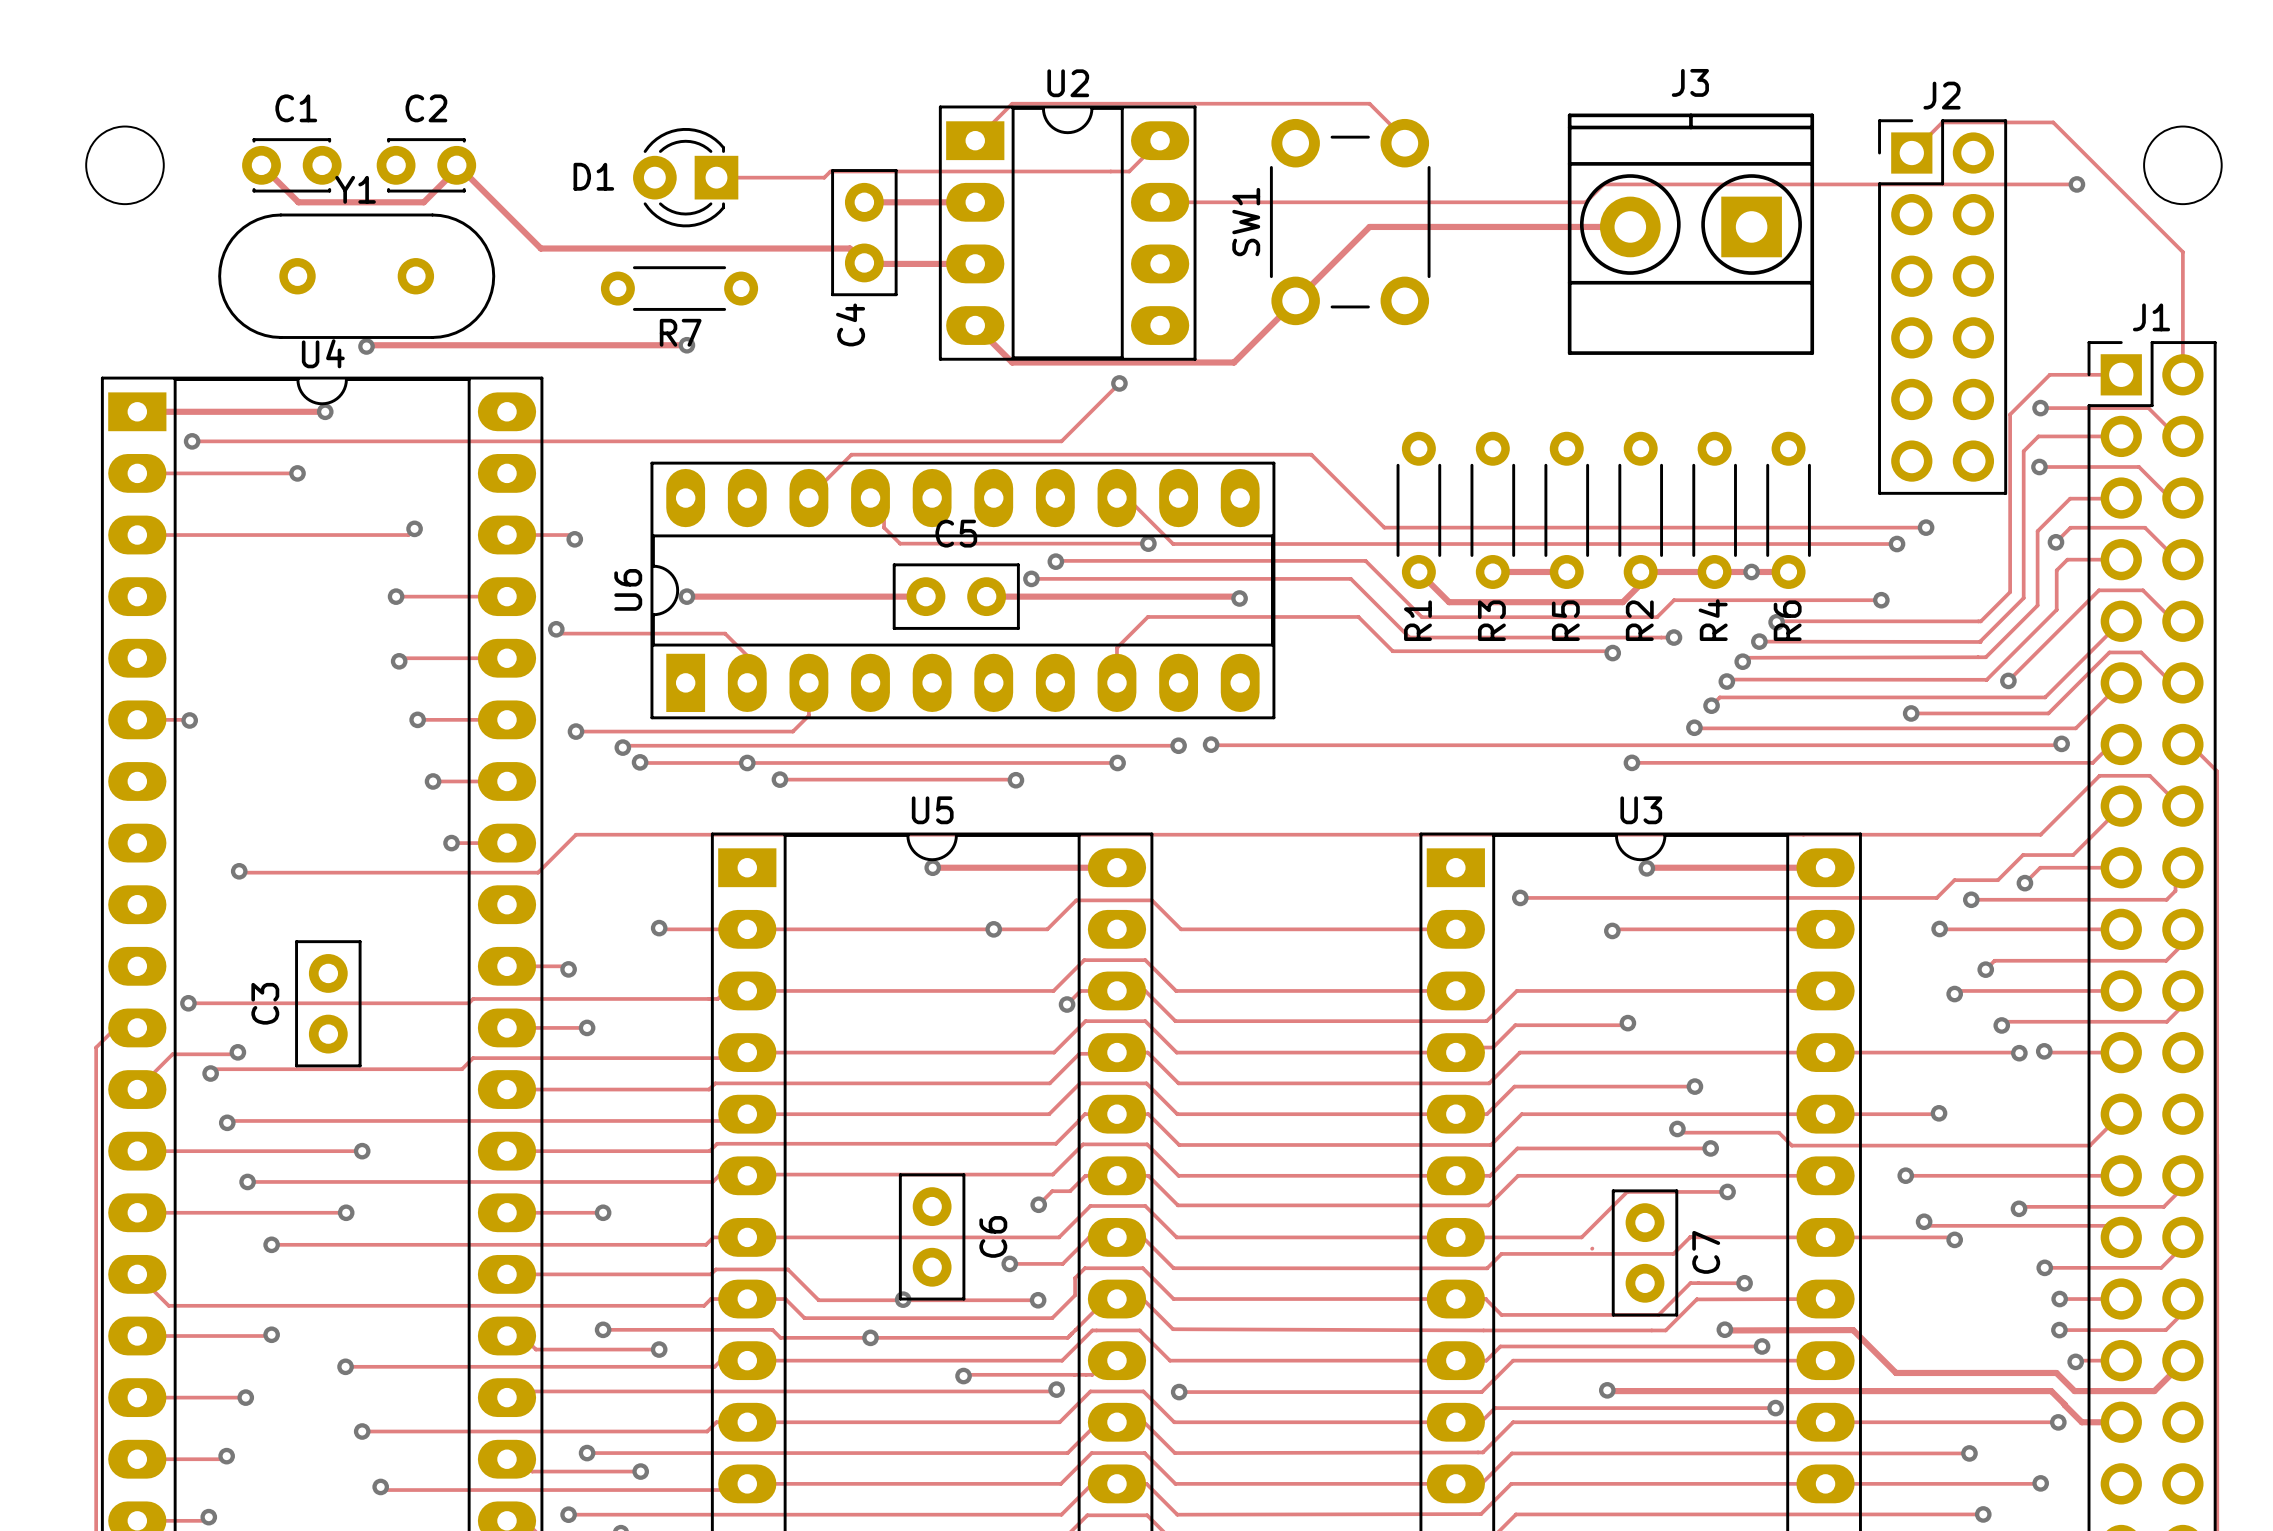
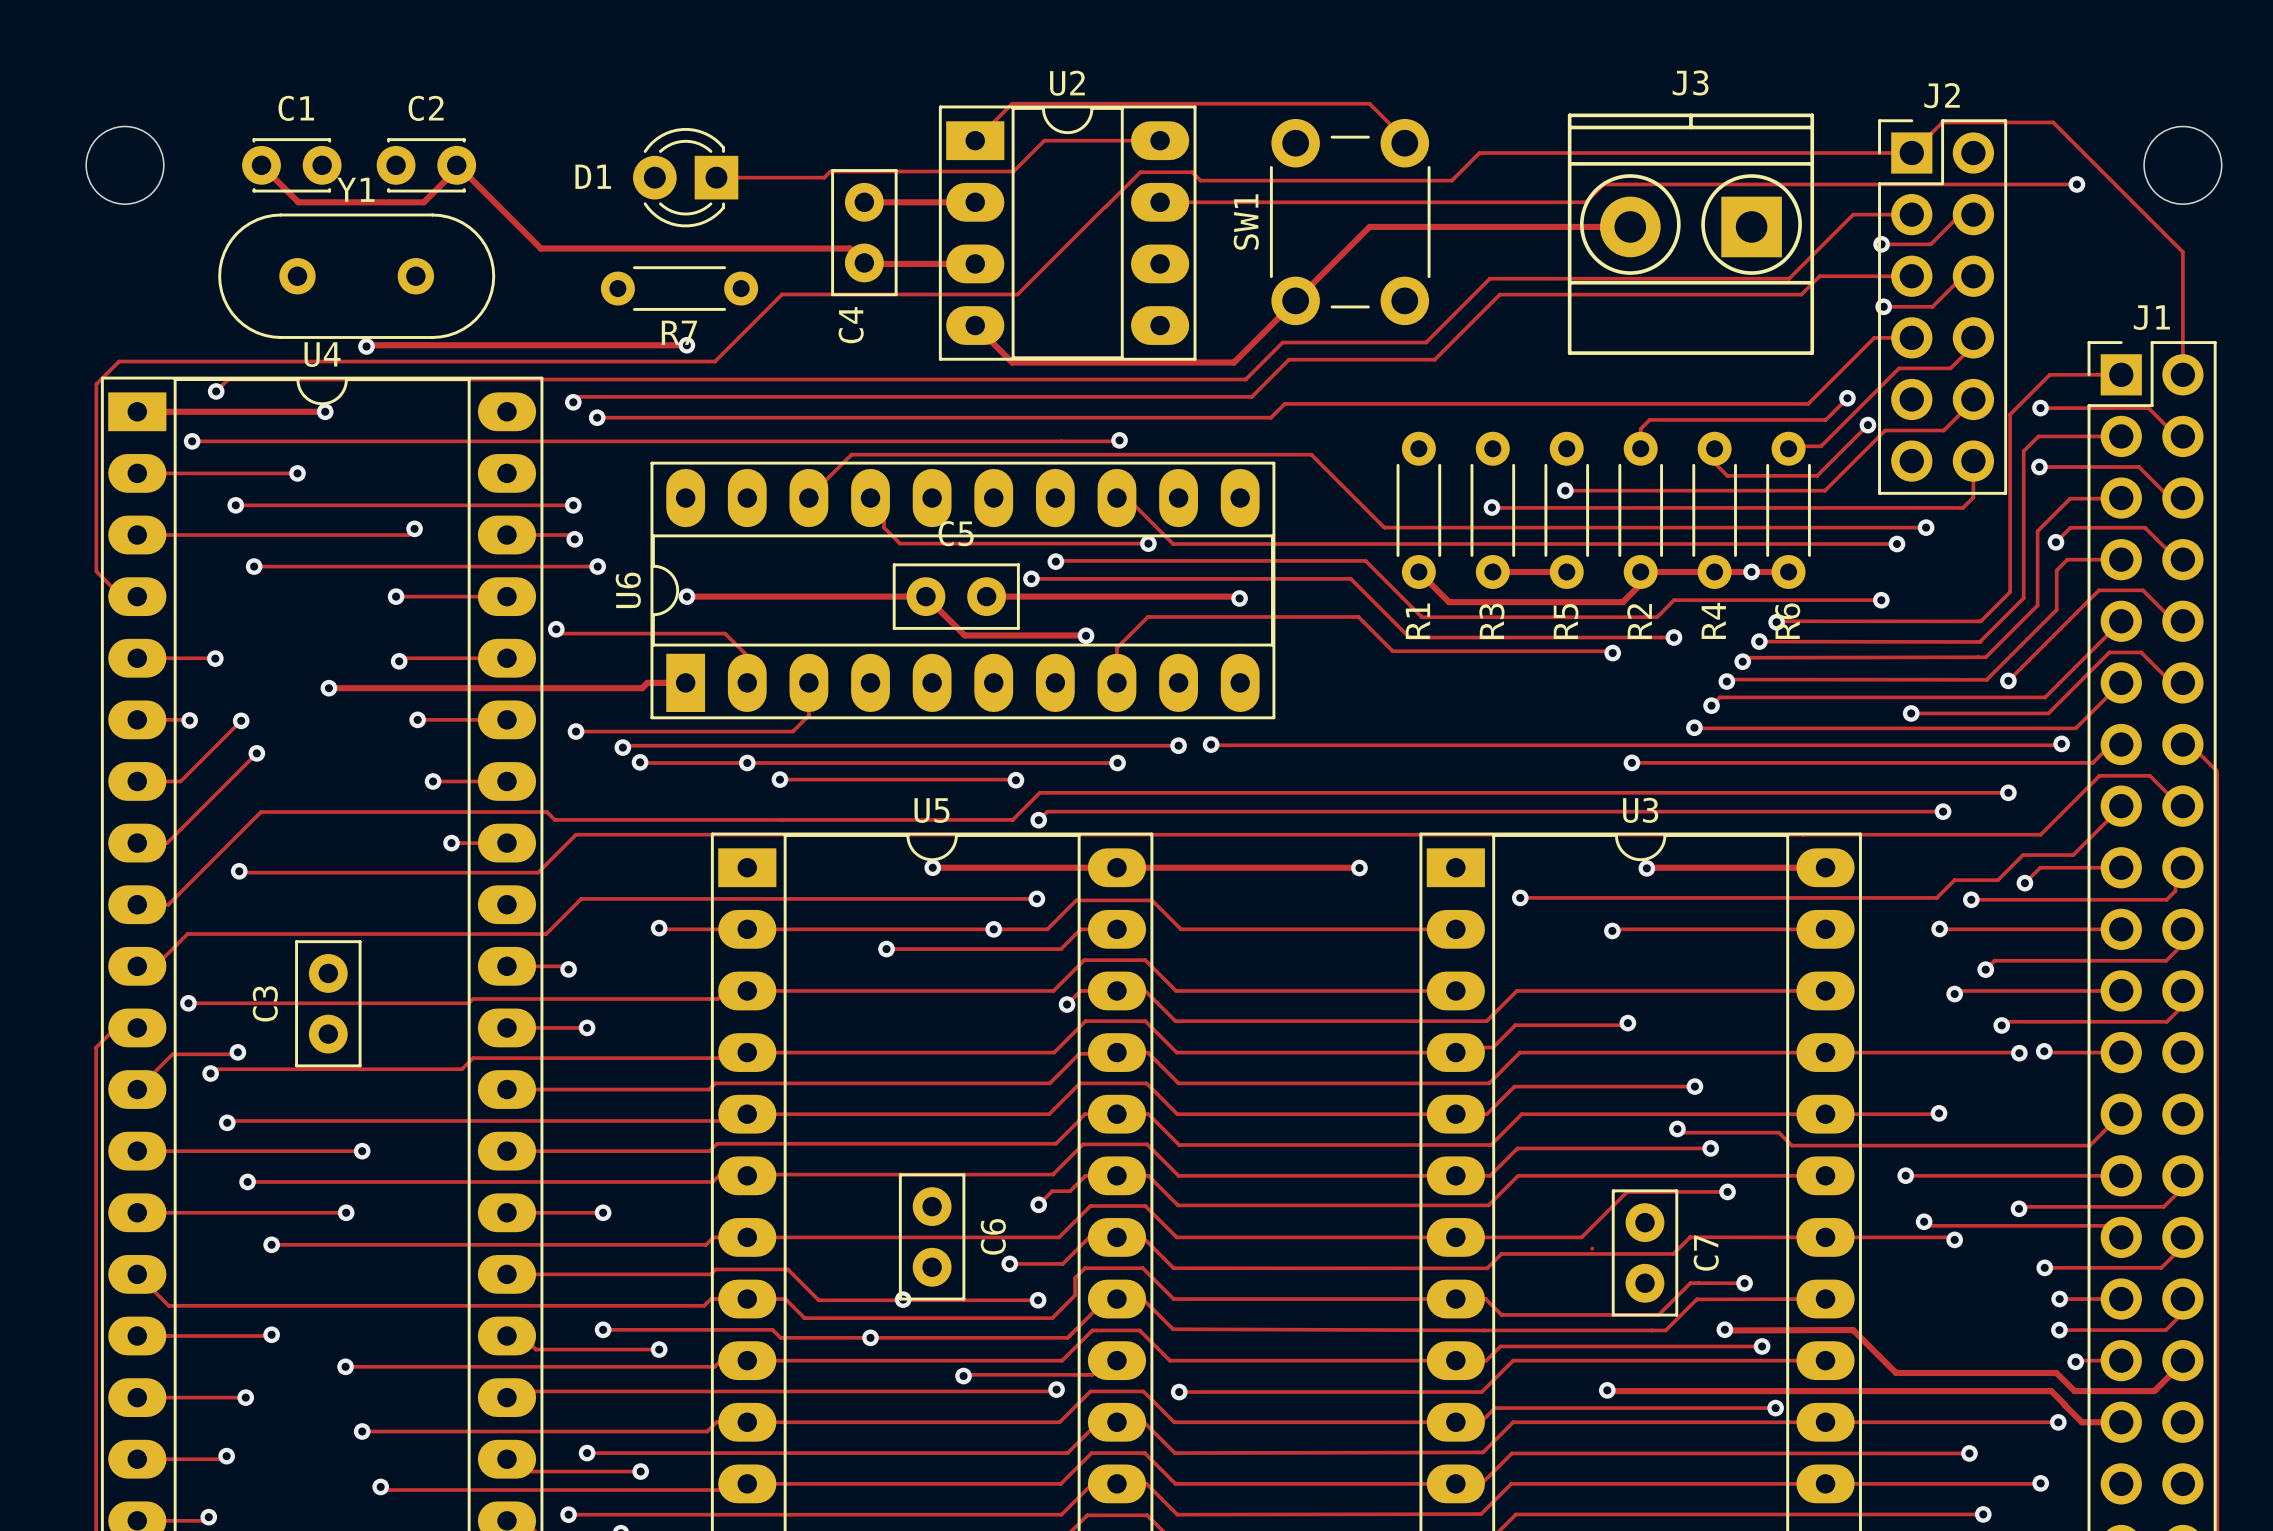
track: (1160, 140) (1129, 171) (1013, 171) -> (1160, 140) (1044, 140) (1013, 171)
track: none -> (1911, 153) (1479, 153) (1451, 180) (1200, 180) (1192, 172) (1140, 172) (1017, 294) (782, 294) (715, 361) (119, 361) (96, 384) (96, 571) (121, 596) (137, 596)
track: none -> (1911, 214) (1853, 214) (1789, 278) (1489, 278) (1426, 342) (1282, 342) (1245, 379) (228, 379) (216, 391)
track: none -> (1973, 214) (1960, 214) (1930, 244) (1881, 244)
via: none -> (1881, 244)
track: none -> (1911, 276) (1819, 276) (1801, 294) (1499, 294) (1434, 359) (1289, 359) (1251, 396) (578, 396) (573, 402)
track: none -> (1973, 276) (1963, 276) (1932, 306) (1883, 306)
via: none -> (1883, 306)
track: none -> (1911, 337) (1874, 337) (1808, 403) (1284, 403) (1271, 417) (597, 417)
track: none -> (1973, 337) (1973, 345) (1950, 368) (1898, 368) (1821, 446) (1791, 446) (1788, 448)
track: (1119, 383) (1061, 441) -> (1119, 440) (1061, 441)
via position: (1119, 383) -> (1119, 440)
via: none -> (216, 391)
track: none -> (1847, 398) (1825, 419) (1649, 419) (1640, 428) (1640, 448)
via: none -> (1847, 398)
track: none -> (1973, 399) (1943, 430) (1885, 430) (1825, 490) (1565, 490)
via: none -> (573, 402)
via: none -> (597, 417)
track: none -> (1867, 425) (1817, 475) (1727, 475) (1714, 463) (1714, 448)
via: none -> (1867, 425)
track: none -> (1973, 461) (1973, 497) (1962, 507) (1491, 507)
via: none -> (1565, 490)
track: none -> (235, 505) (573, 505)
via: none -> (235, 505)
via: none -> (573, 505)
via: none -> (1491, 507)
track: none -> (254, 566) (597, 566)
via: none -> (254, 566)
via: none -> (597, 566)
track: none -> (925, 596) (964, 635) (1086, 635)
via: none -> (1086, 635)
track: none -> (137, 658) (215, 658)
via: none -> (215, 658)
track: none -> (685, 682) (647, 682) (642, 688) (328, 688)
via: none -> (328, 688)
track: none -> (241, 720) (180, 781) (137, 781)
via: none -> (241, 720)
track: none -> (256, 753) (167, 843) (137, 843)
via: none -> (256, 753)
track: none -> (2008, 792) (1039, 792) (1012, 819) (554, 819) (546, 812) (261, 812) (168, 904) (137, 904)
via: none -> (2008, 792)
track: none -> (1943, 811) (1047, 811) (1038, 820)
via: none -> (1943, 811)
via: none -> (1038, 820)
track: none -> (1116, 867) (1359, 867)
via: none -> (1359, 867)
track: none -> (1036, 898) (581, 898) (546, 934) (187, 934) (155, 966) (137, 966)
via: none -> (1036, 898)
track: none -> (1116, 929) (1080, 929) (1061, 949) (886, 949)
via: none -> (886, 949)

